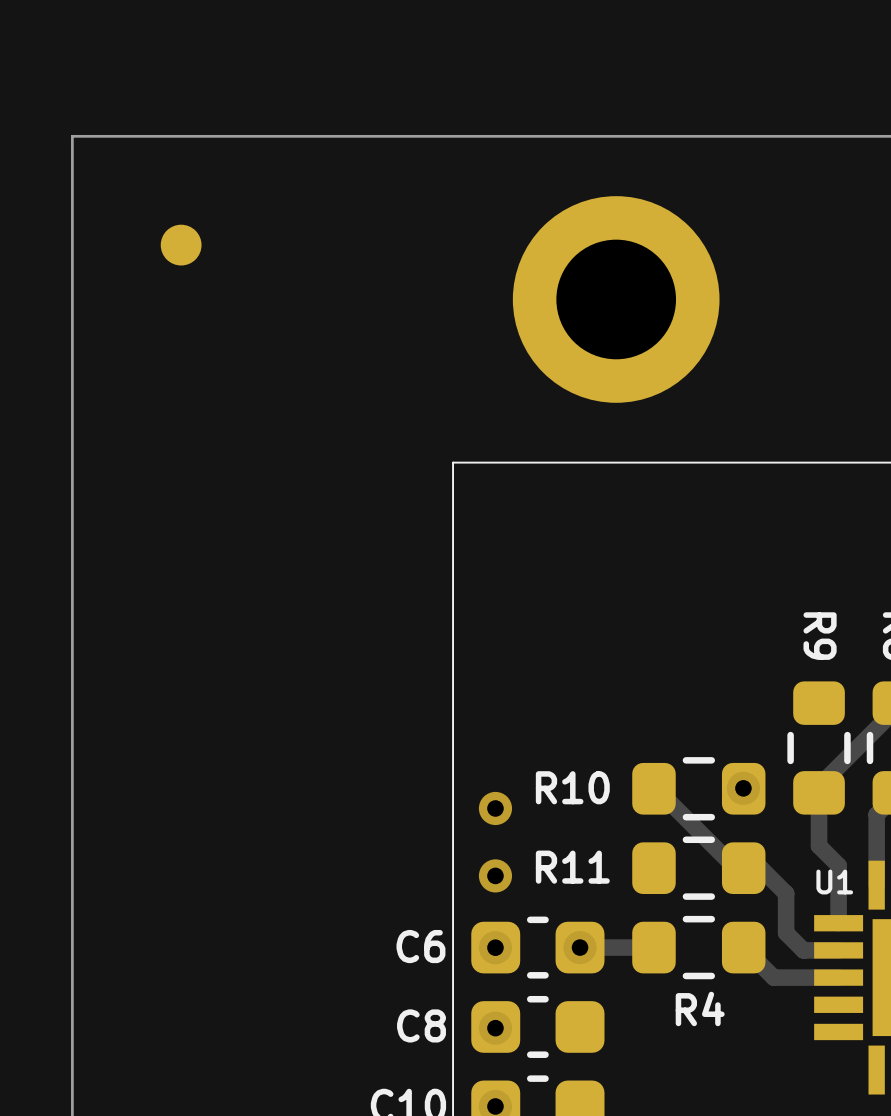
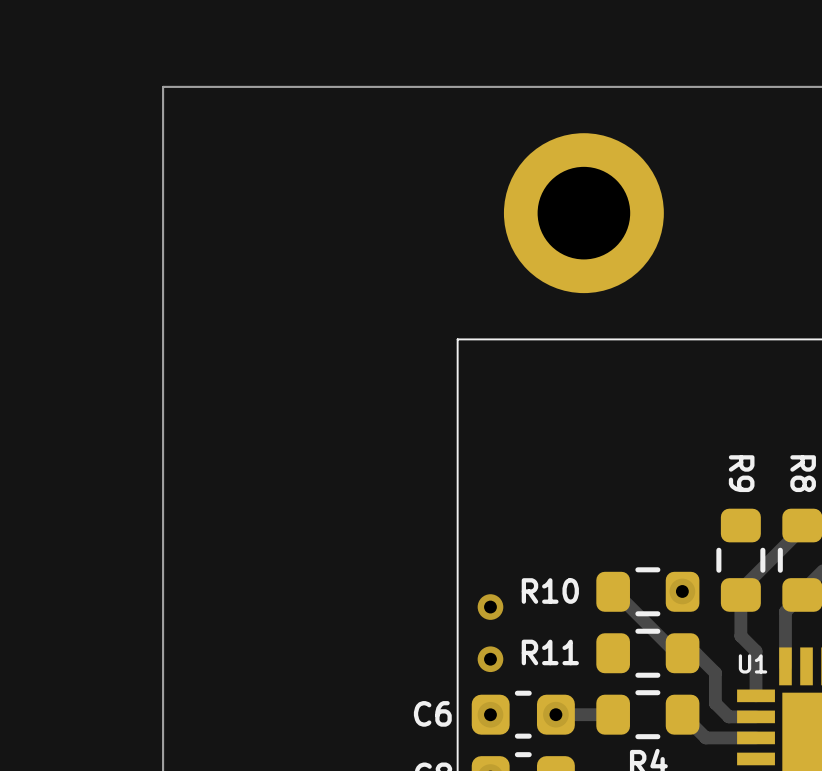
part: (181, 245) -> none

